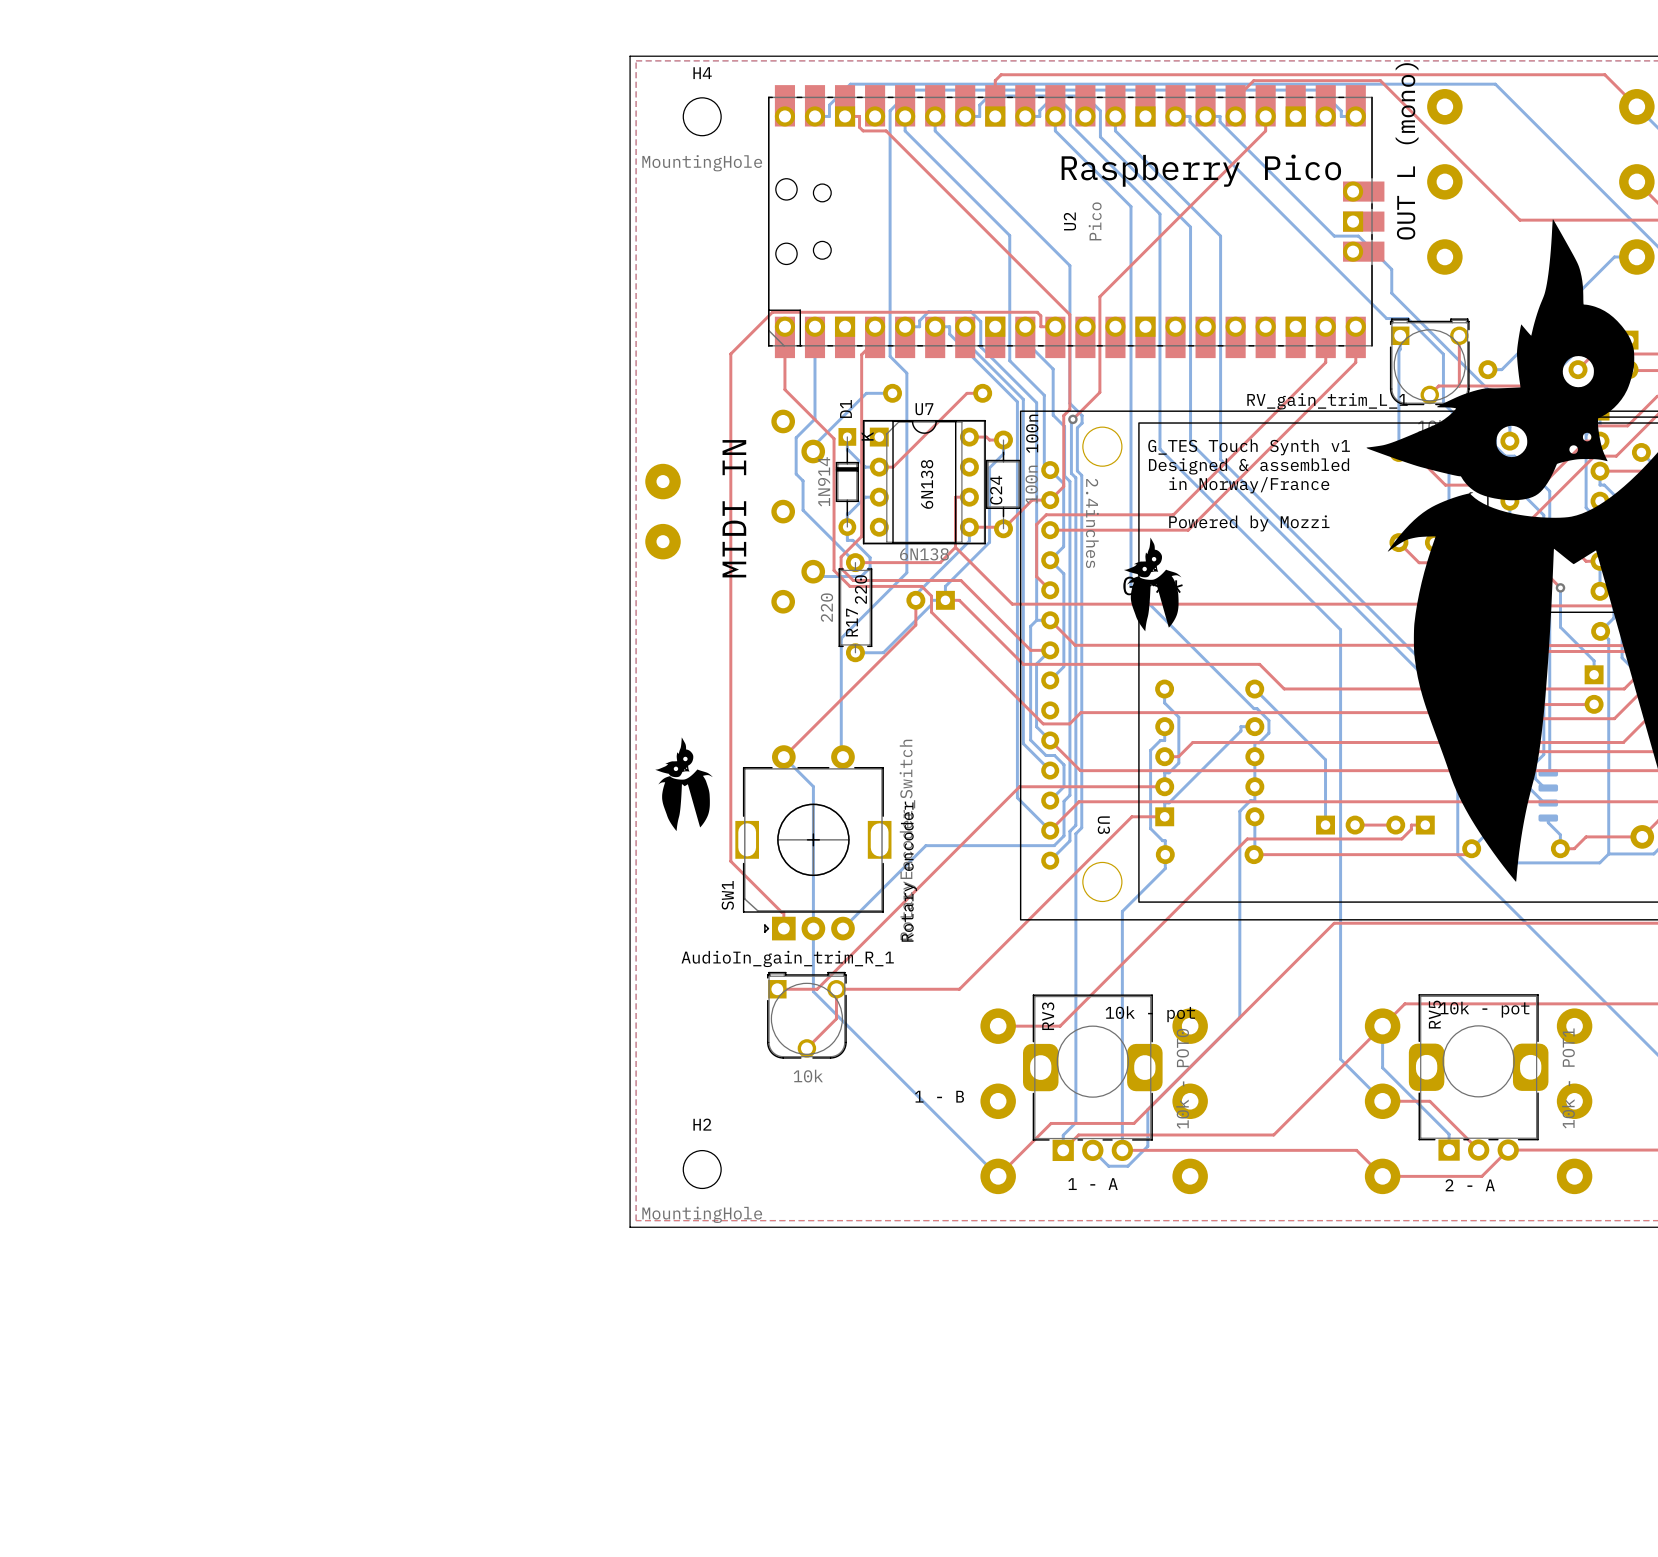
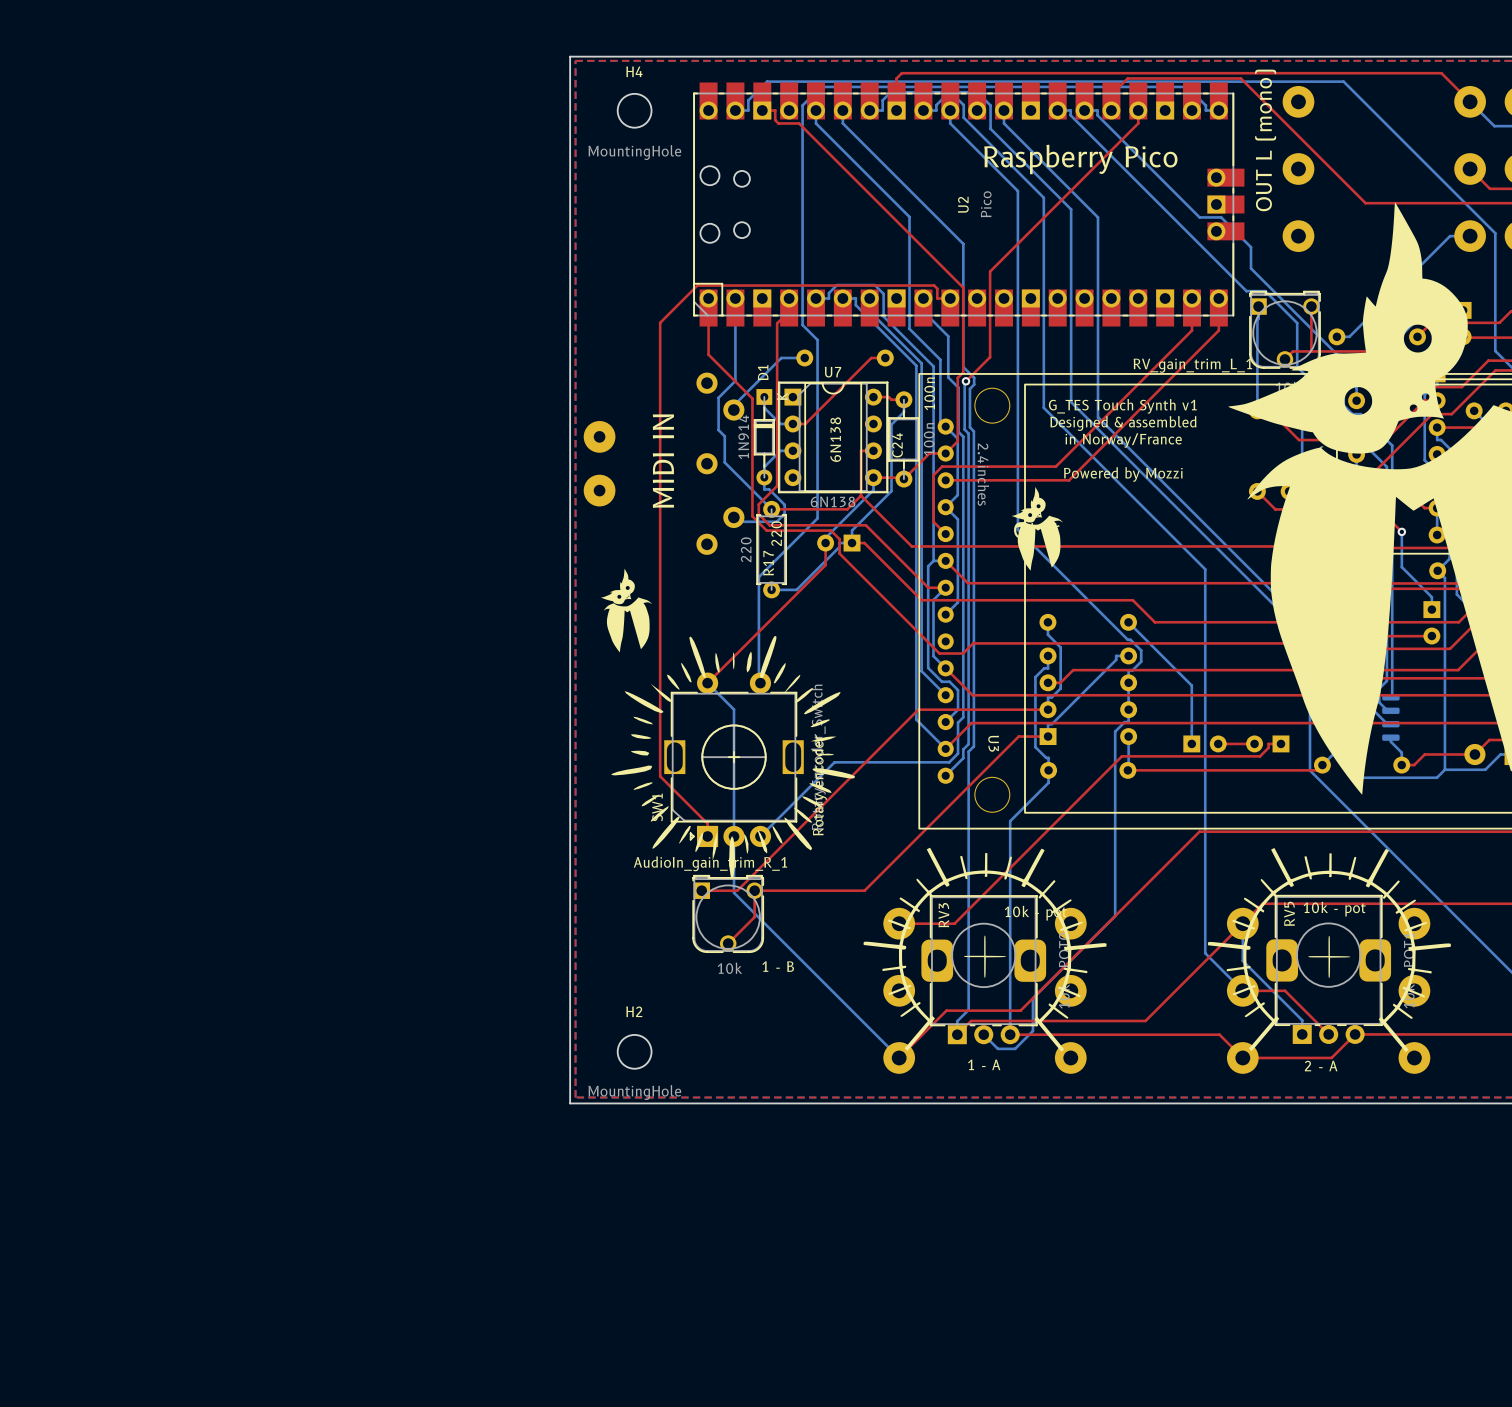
drawing: none -> [611, 635, 1107, 1052]
drawing position: (684, 784) -> (626, 610)
drawing: none -> [1207, 848, 1451, 1053]
text position: 1 - B (939, 1096) -> 1 - B (778, 966)

